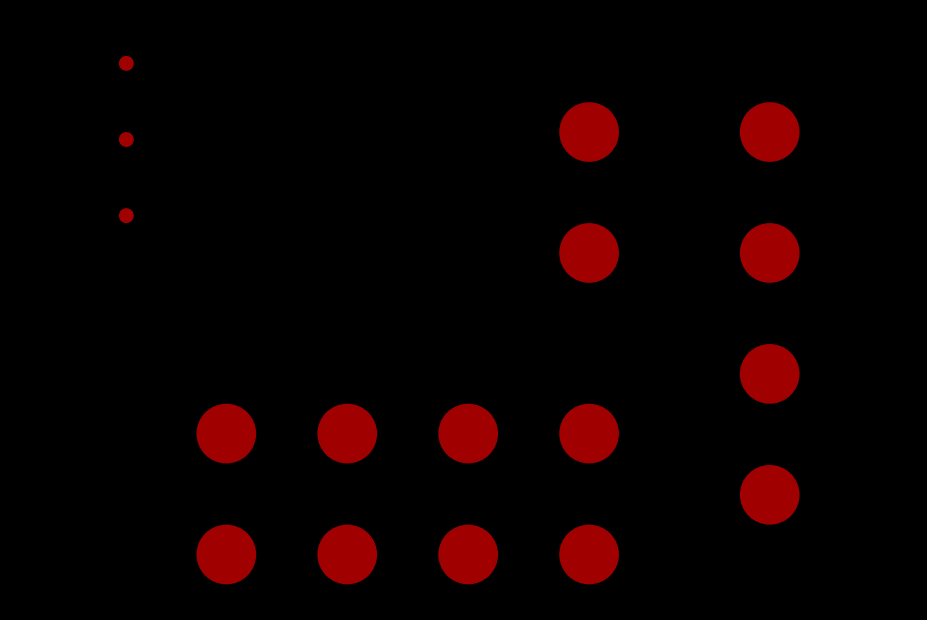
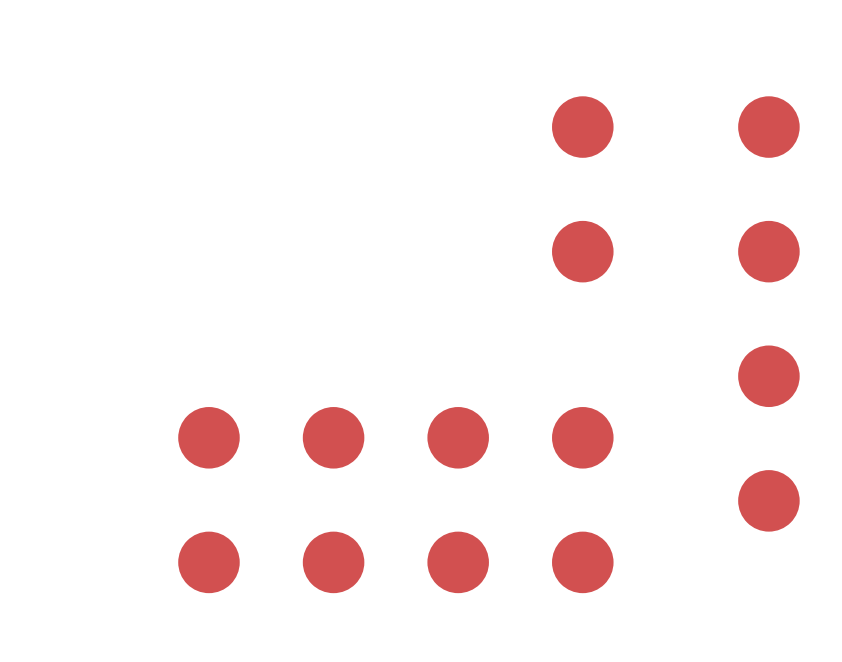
part: (126, 63) -> none
part: (126, 139) -> none
part: (126, 215) -> none

